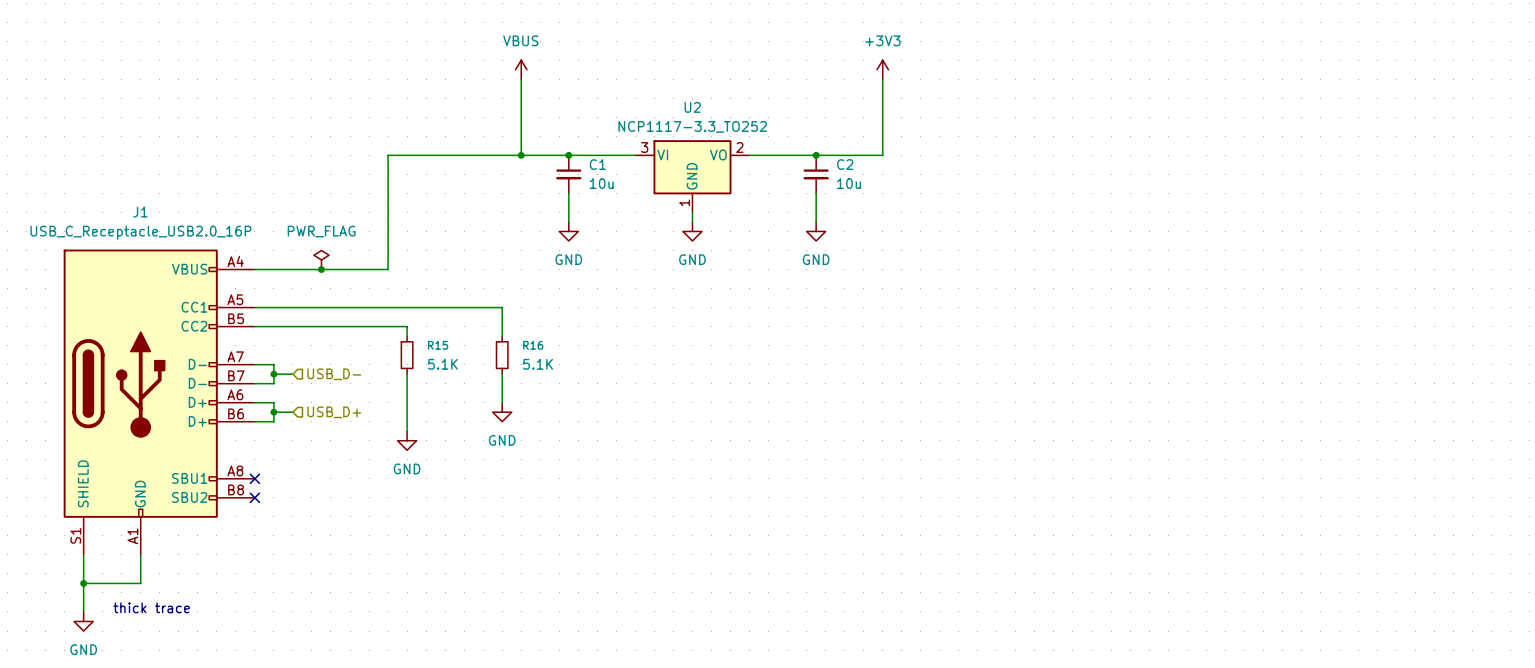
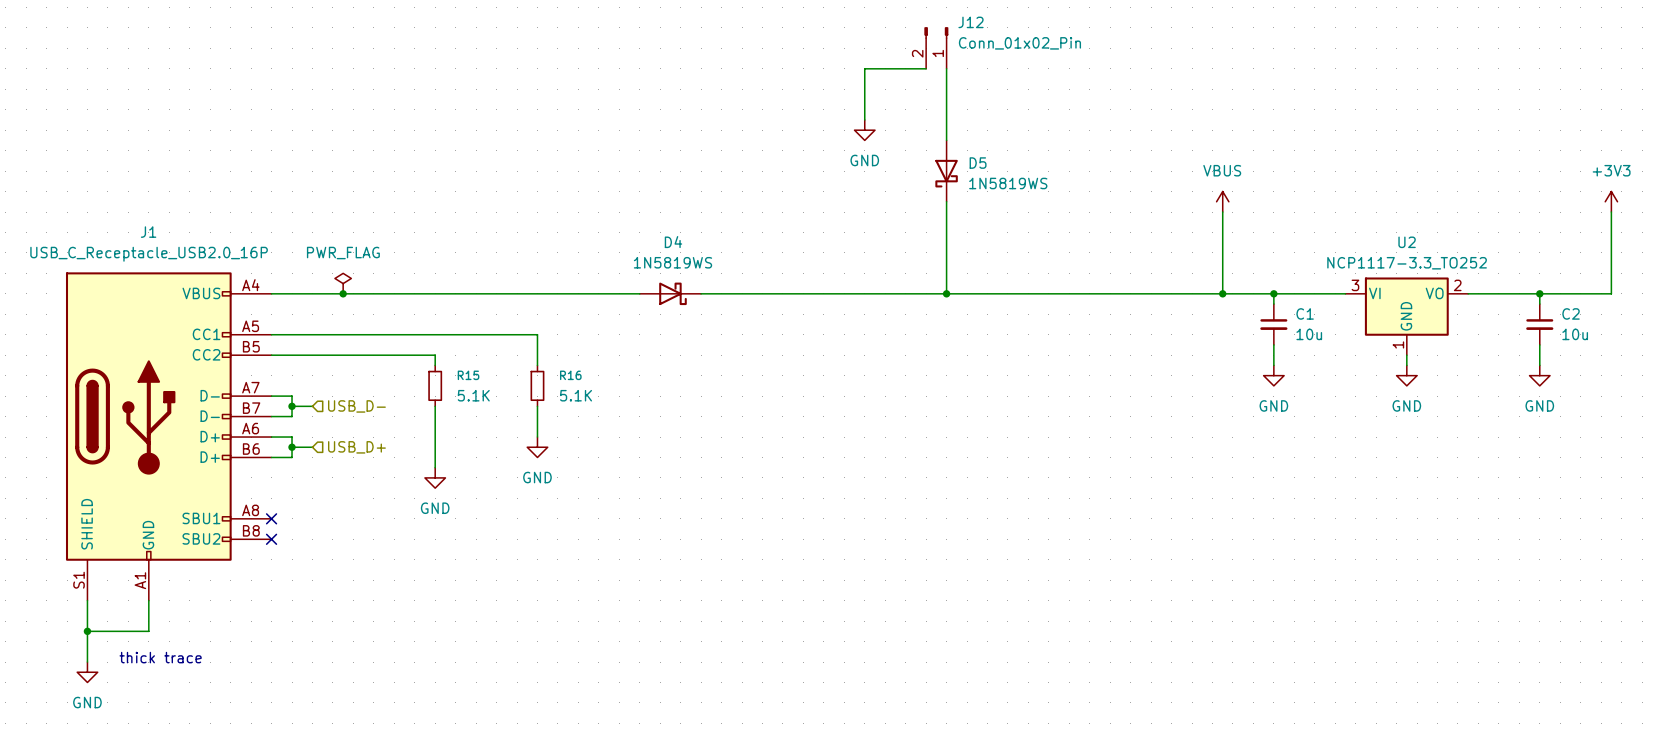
J12: none -> Conn_01x02_Pin (936, 48)
wire: none -> (926, 68) (864, 68) (864, 119)
power symbol: VBUS (521, 69) -> none
power symbol: +3V3 (882, 69) -> none
wire: (521, 79) (521, 155) -> none
power symbol: none -> GND (864, 130)
wire: (882, 126) (882, 155) (749, 155) -> none
junction: (521, 155) -> none
junction: (568, 155) -> none
wire: (635, 155) (388, 155) (388, 269) -> (639, 293) (414, 293)
junction: (816, 155) -> none
D5: none -> 1N5819WS (946, 171)
C1 position: (568, 174) -> (1273, 324)
C2 position: (816, 174) -> (1539, 324)
U2 position: (692, 176) -> (1406, 316)
wire: none -> (946, 201) (946, 293)
power symbol: none -> VBUS (1222, 201)
power symbol: none -> +3V3 (1611, 201)
wire: (568, 193) (568, 221) -> none
wire: (816, 193) (816, 221) -> none
wire: none -> (1222, 212) (1222, 293)
wire: none -> (1611, 212) (1611, 293) (1468, 293)
wire: (692, 212) (692, 221) -> none
power symbol: GND (568, 231) -> none
power symbol: GND (692, 231) -> none
power symbol: GND (816, 231) -> none
D4: none -> 1N5819WS (670, 293)
wire: none -> (701, 293) (1345, 293)
junction: none -> (946, 293)
junction: none -> (1222, 293)
wire: none -> (1273, 293) (1273, 304)
junction: none -> (1273, 293)
wire: none -> (1539, 293) (1539, 304)
junction: none -> (1539, 293)
wire: none -> (1273, 344) (1273, 365)
wire: none -> (1539, 344) (1539, 365)
wire: none -> (1406, 355) (1406, 365)
power symbol: none -> GND (1273, 375)
power symbol: none -> GND (1406, 375)
power symbol: none -> GND (1539, 375)

